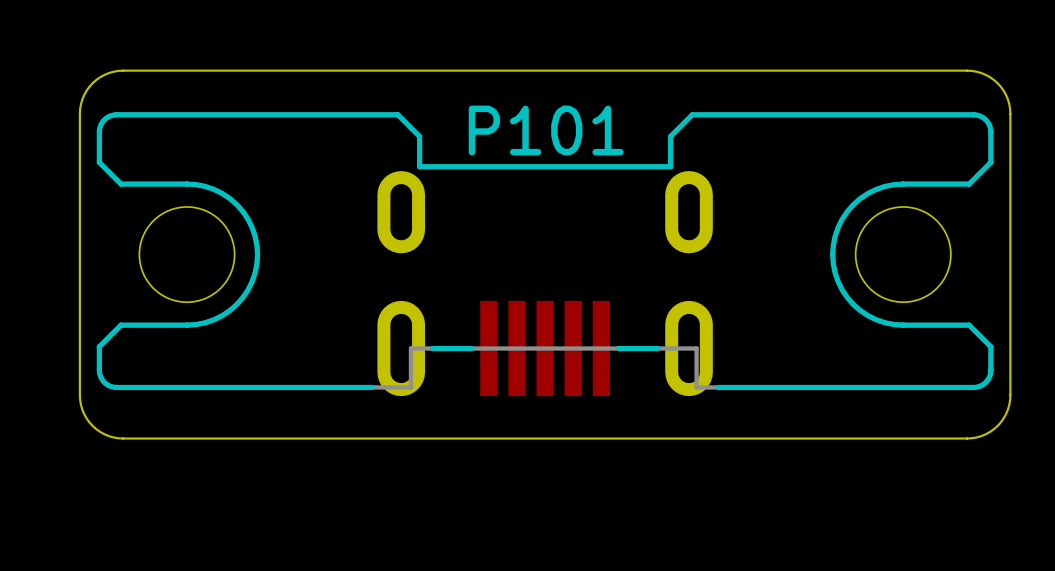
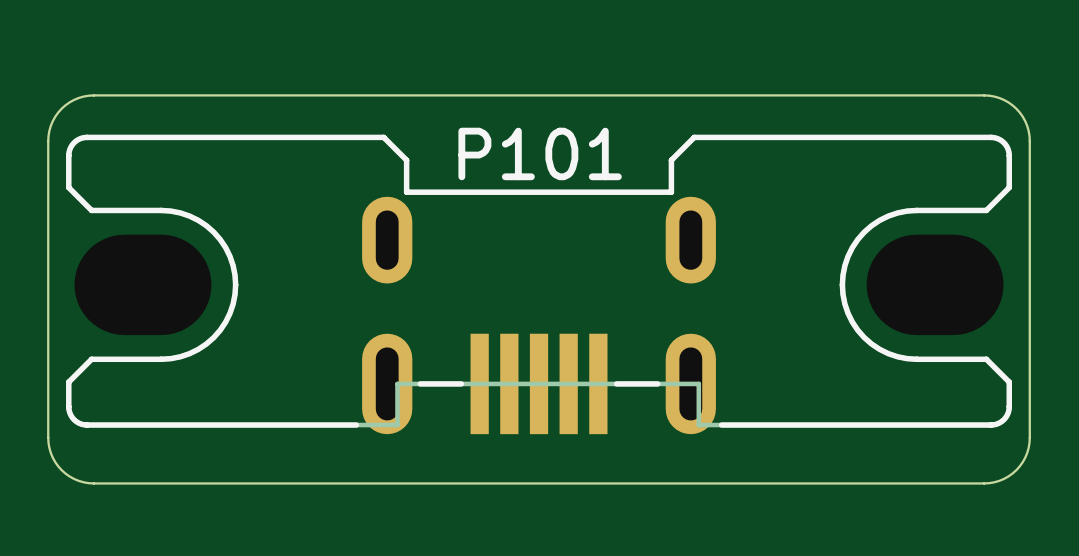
P101 footprint: [96, 112, 994, 397] -> [66, 134, 1012, 435]

